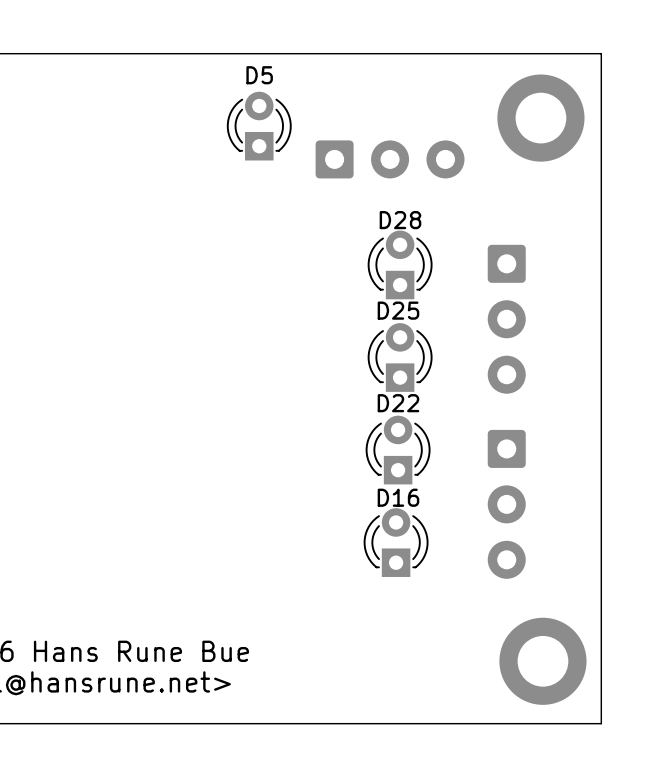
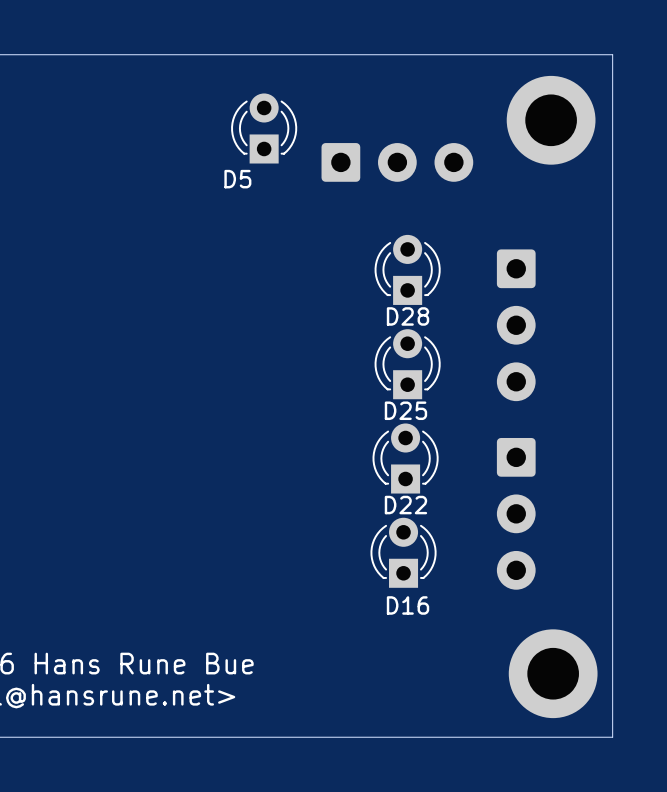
D5 name position: D5 (259, 75) -> D5 (237, 179)
D28 name position: D28 (400, 220) -> D28 (408, 316)
D25 name position: D25 (398, 310) -> D25 (405, 410)
D22 name position: D22 (398, 403) -> D22 (405, 505)
D16 name position: D16 (398, 497) -> D16 (408, 605)

